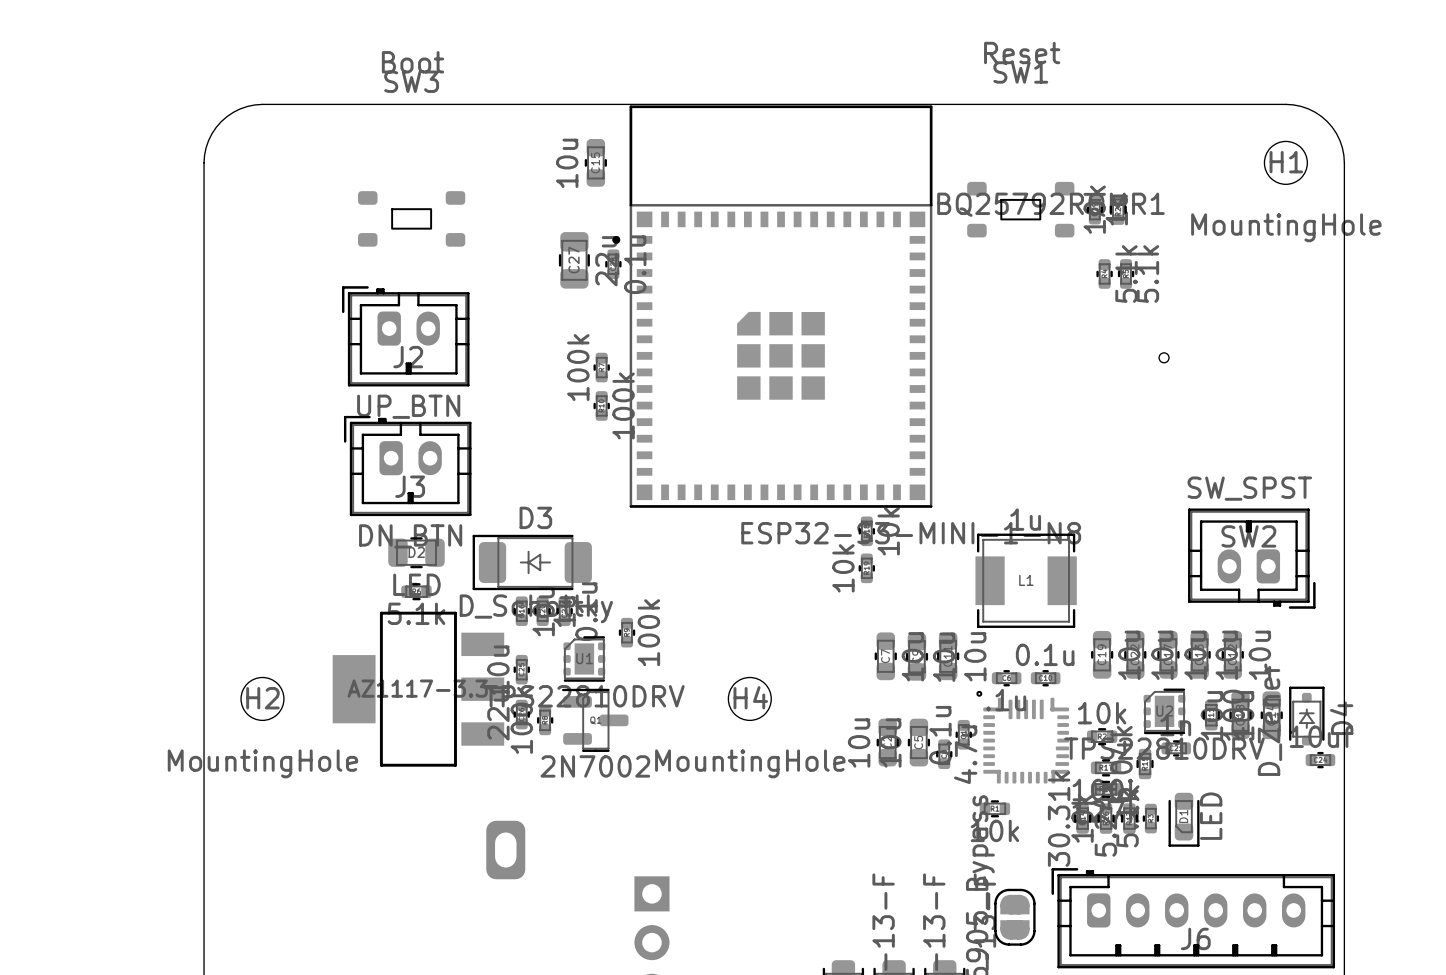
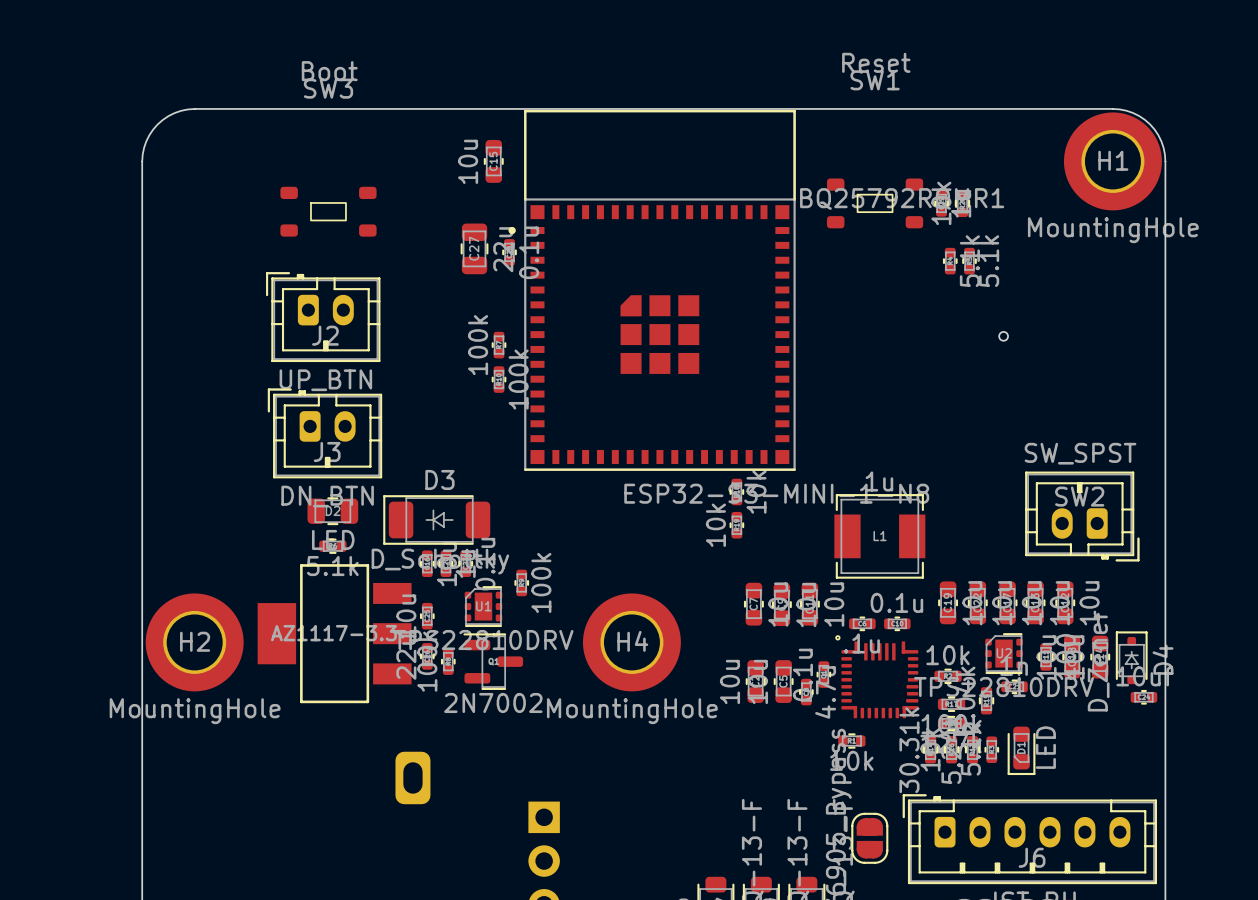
H1 footprint: [1264, 141, 1308, 185] -> [1063, 112, 1162, 211]
H2 footprint: [241, 677, 284, 721] -> [145, 593, 244, 692]
H4 footprint: [728, 677, 772, 721] -> [582, 593, 681, 692]

